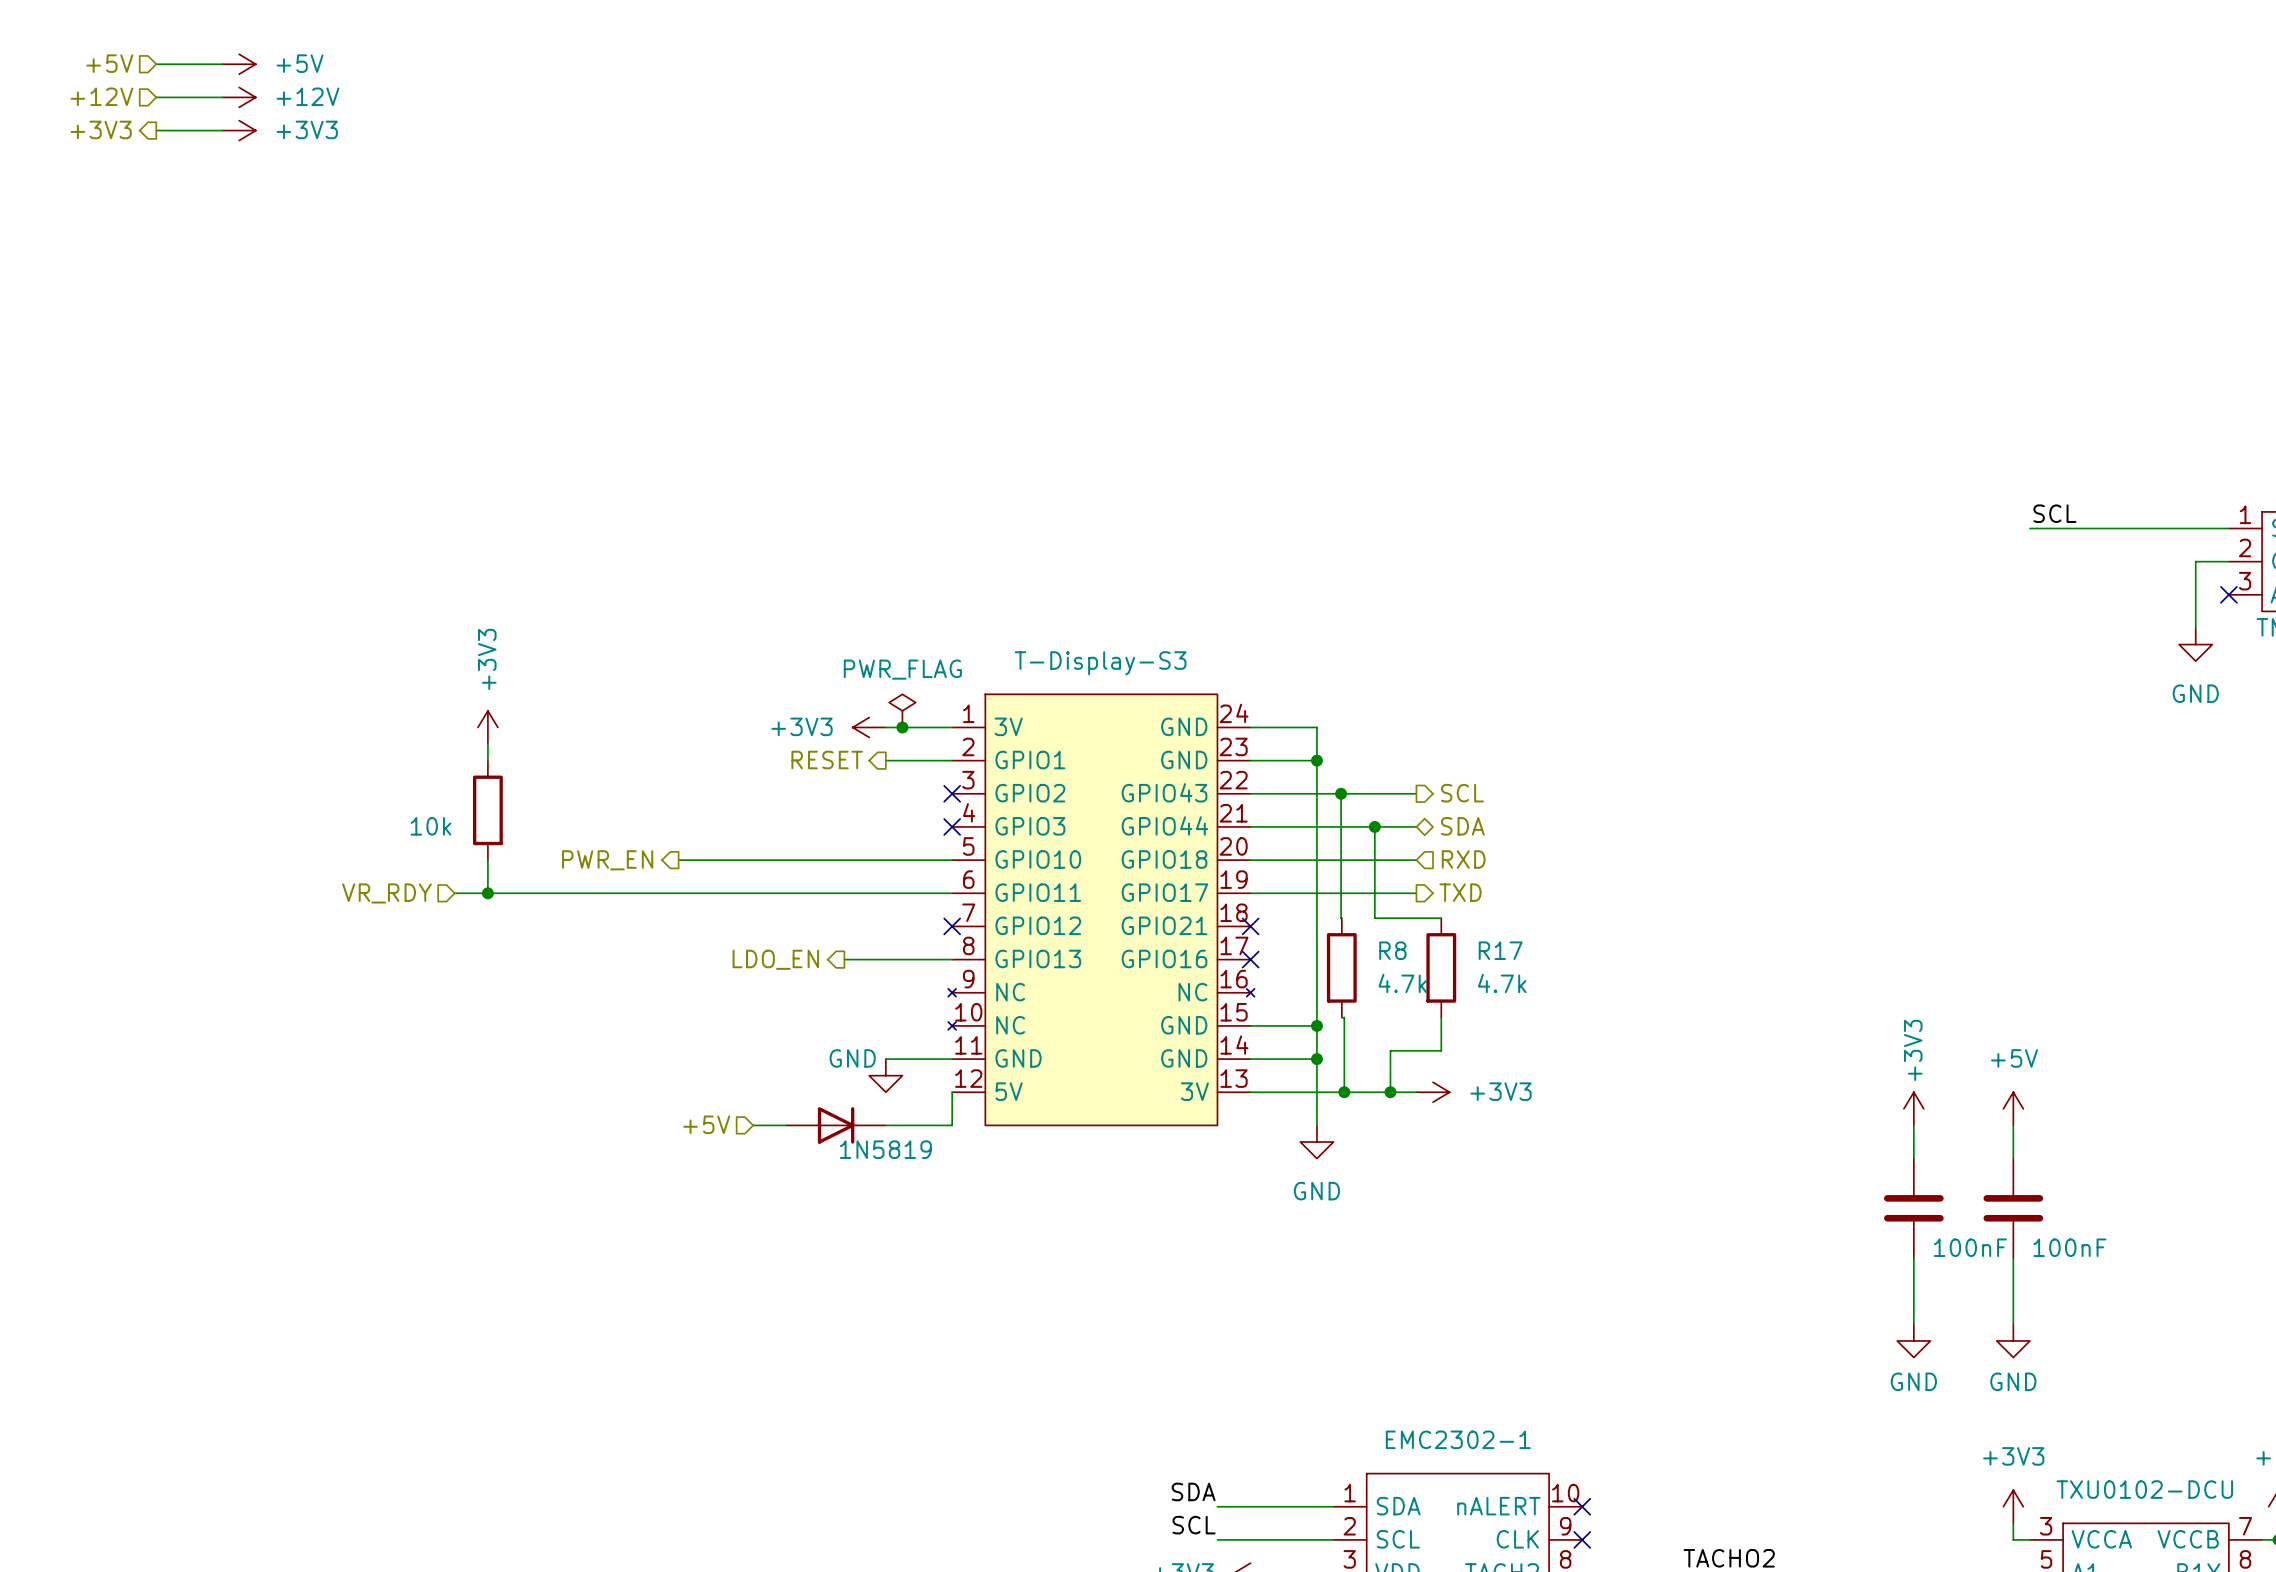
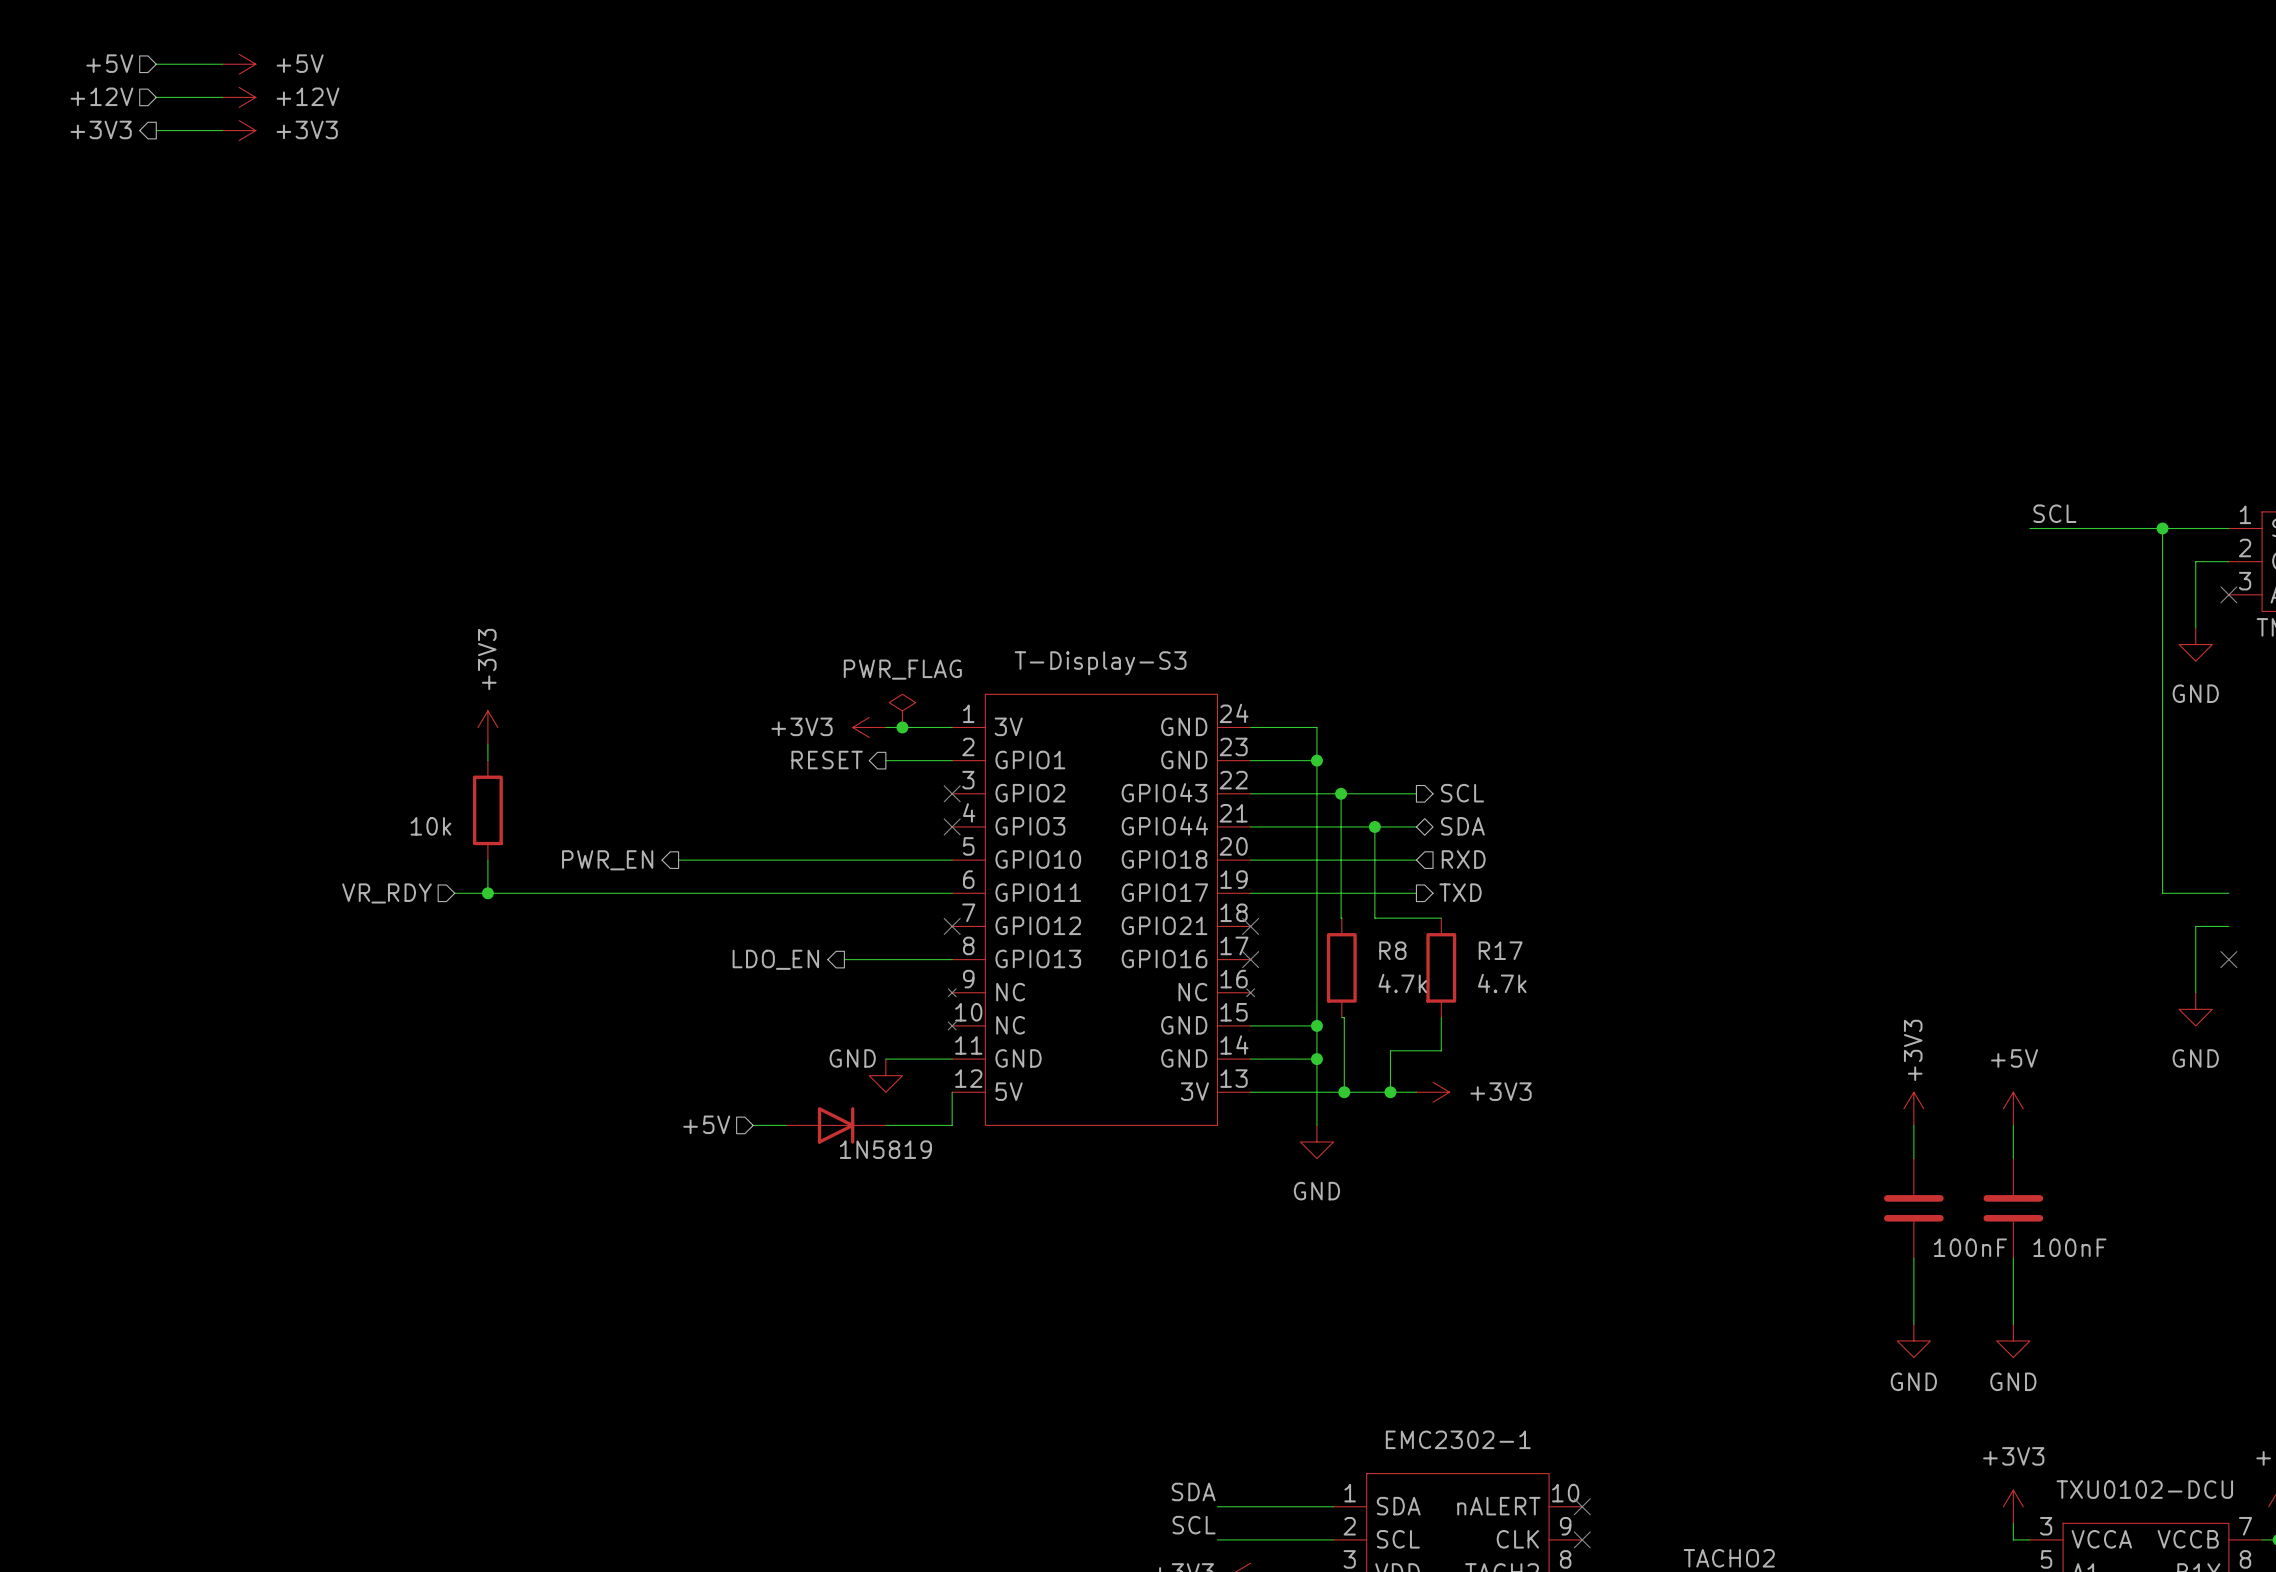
wire: none -> (2162, 528) (2162, 893) (2228, 893)
junction: none -> (2162, 528)
wire: none -> (2228, 926) (2195, 926) (2195, 992)
no-connect mark: none -> (2228, 959)
power symbol: none -> GND (2195, 1009)

